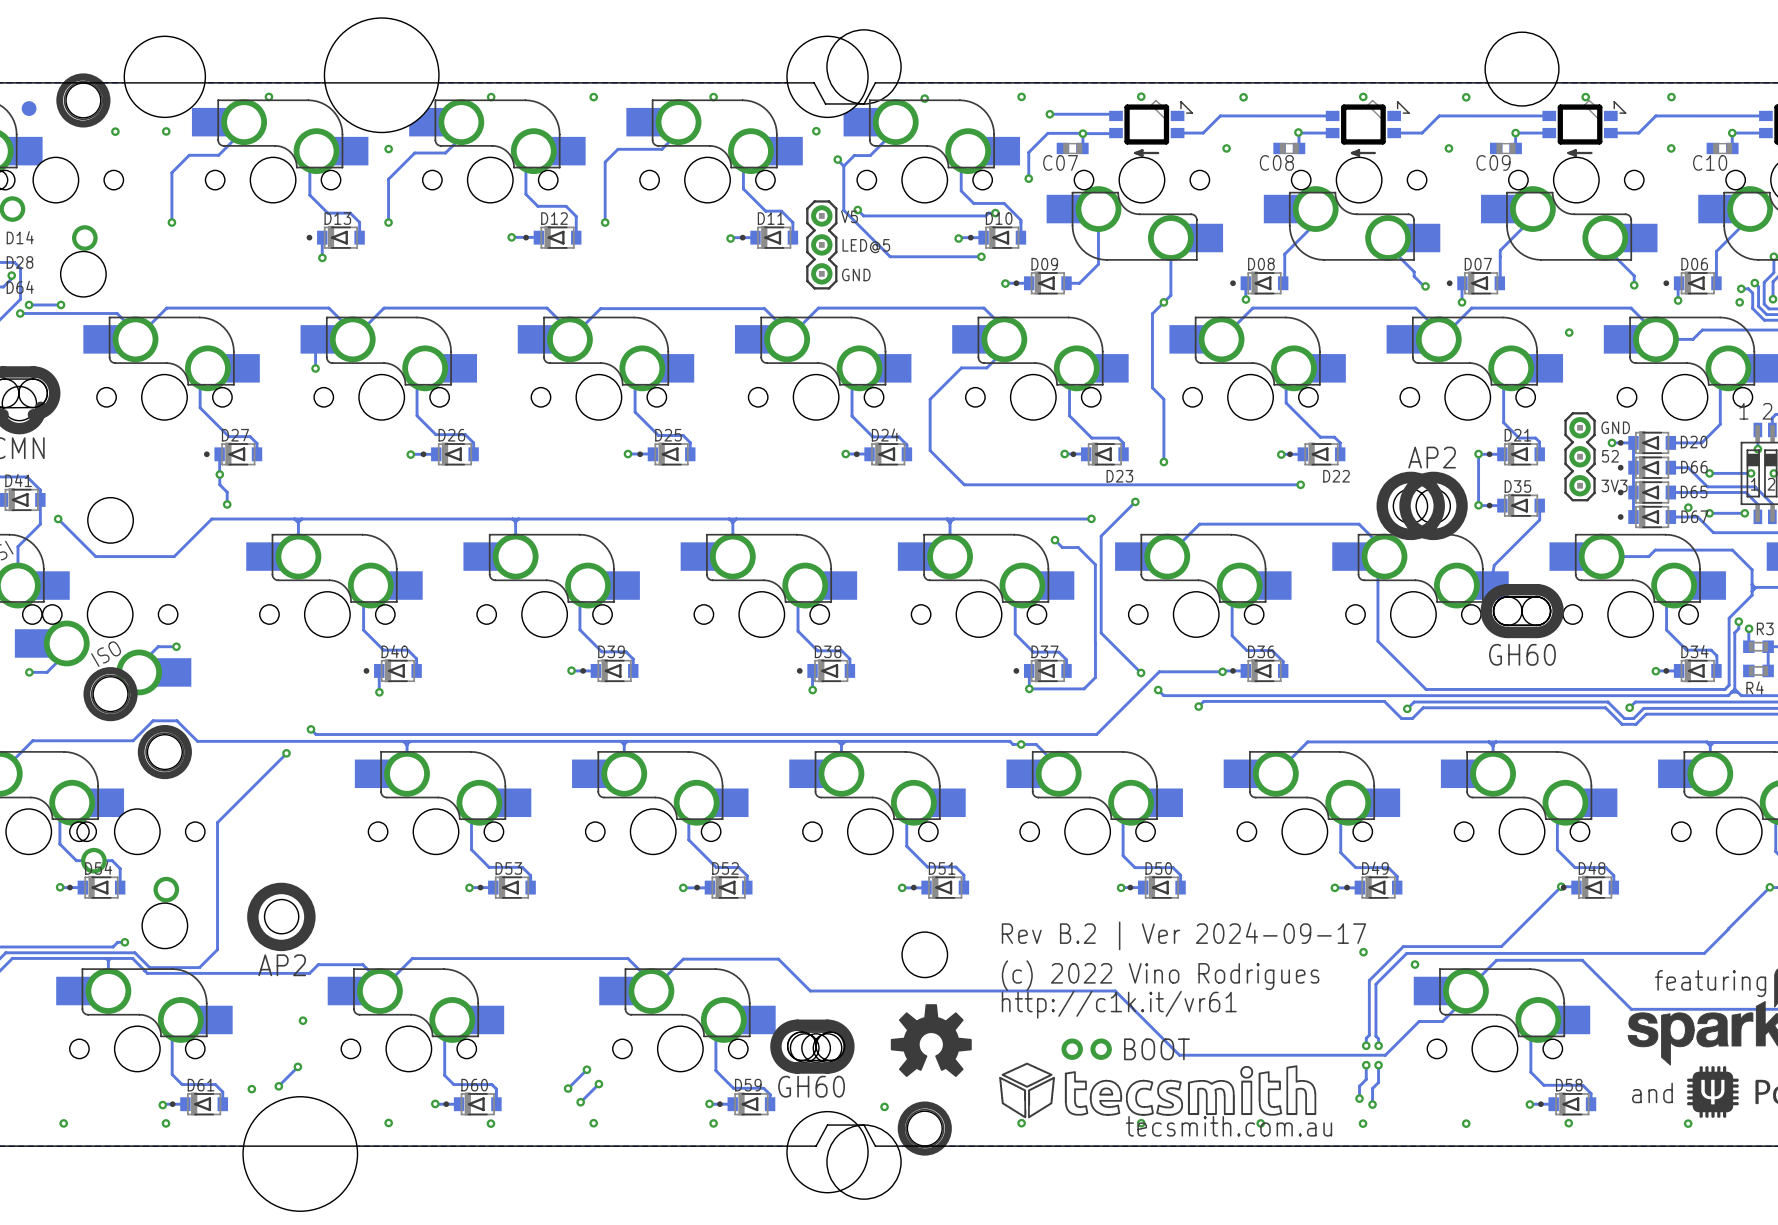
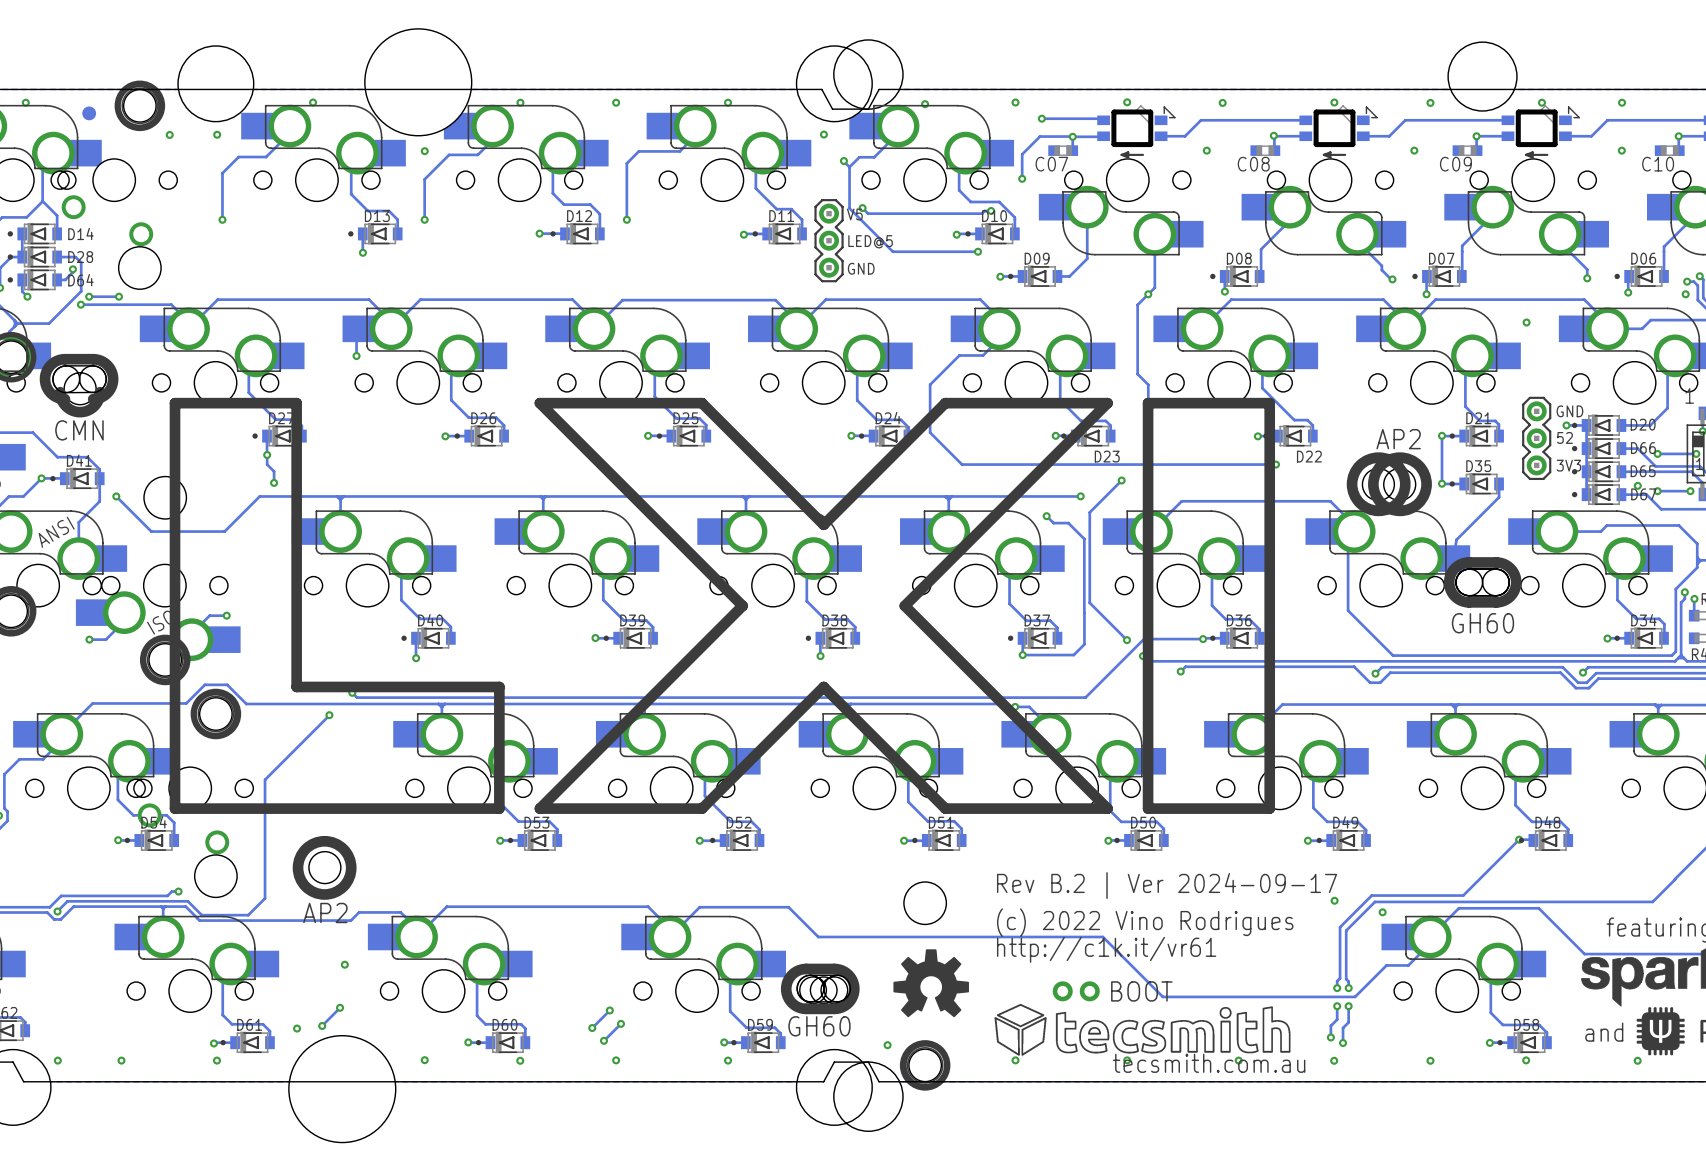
line: none -> (296, 403) (175, 403) (175, 808) (499, 808) (499, 686) (296, 686) (296, 403)
line: none -> (1107, 403) (945, 403) (823, 524) (702, 403) (539, 403) (742, 605) (539, 808) (702, 808) (823, 686) (945, 808) (1107, 808) (904, 605) (1107, 403)
line: none -> (1269, 403) (1148, 403) (1148, 808) (1269, 808) (1269, 403)

